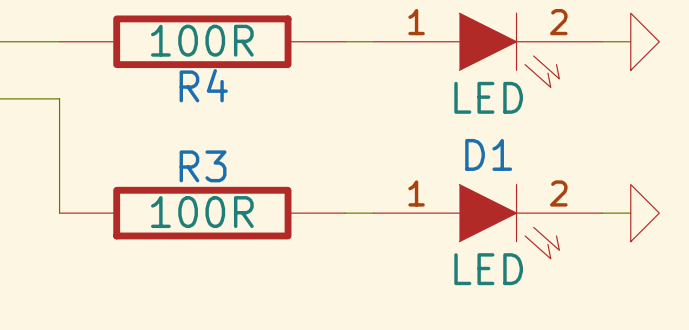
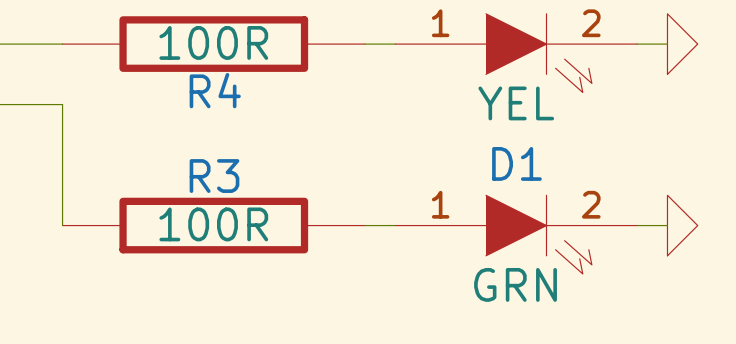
part value: LED (488, 97) -> YEL (516, 103)
D1 value: LED (488, 269) -> GRN (515, 284)

